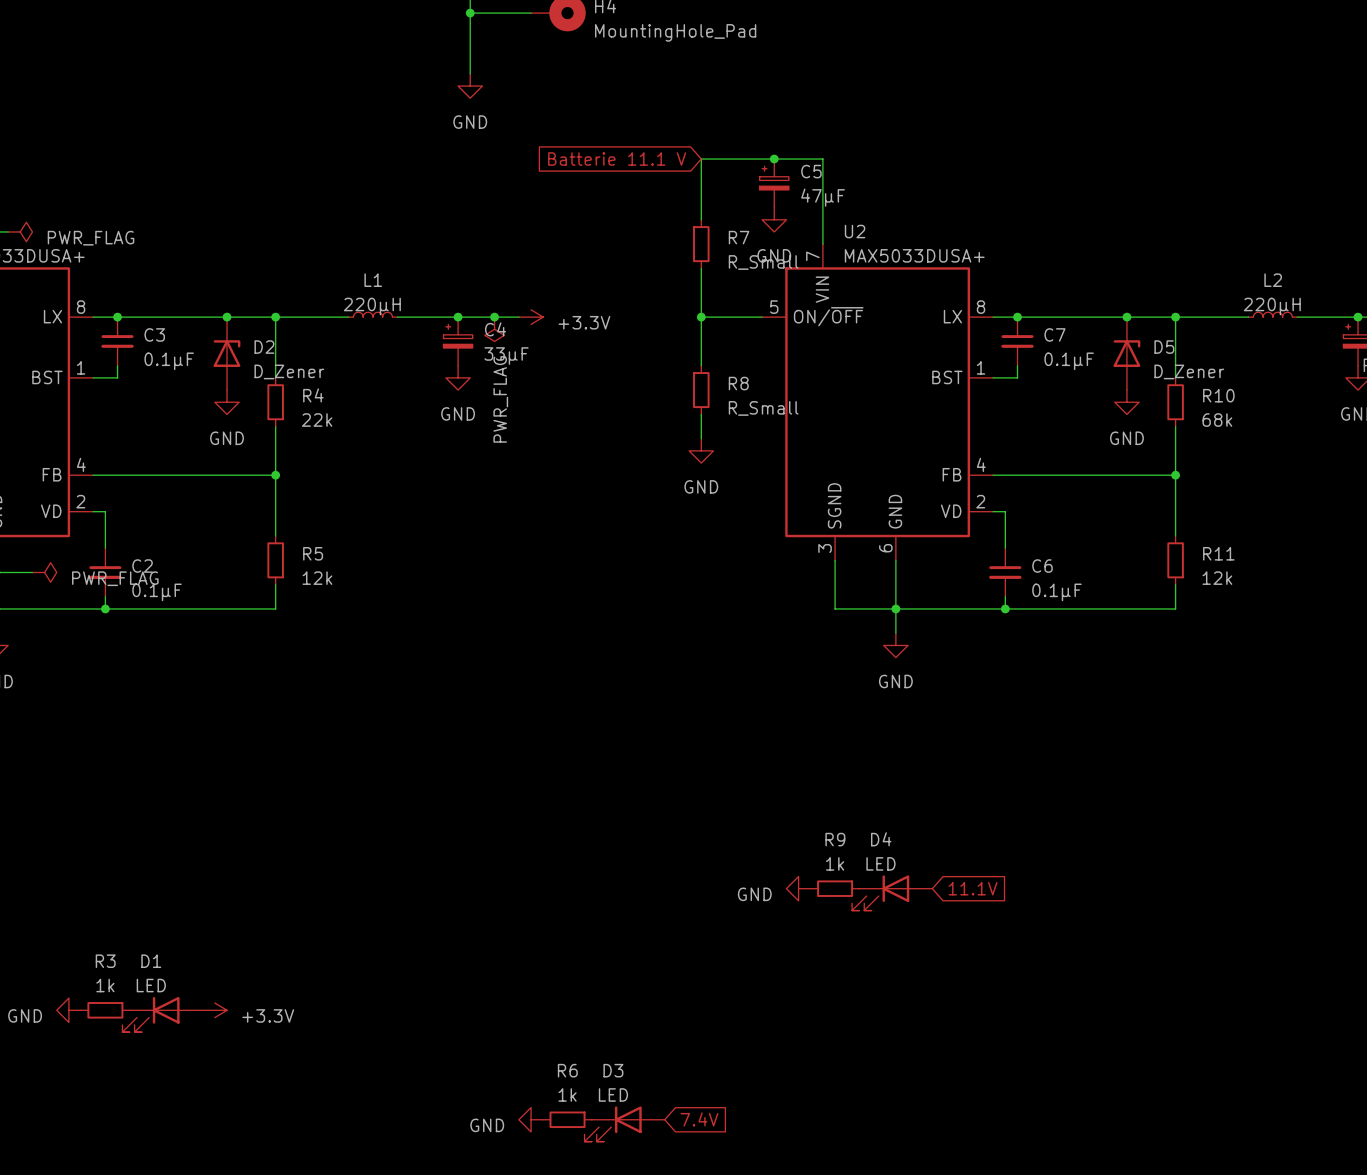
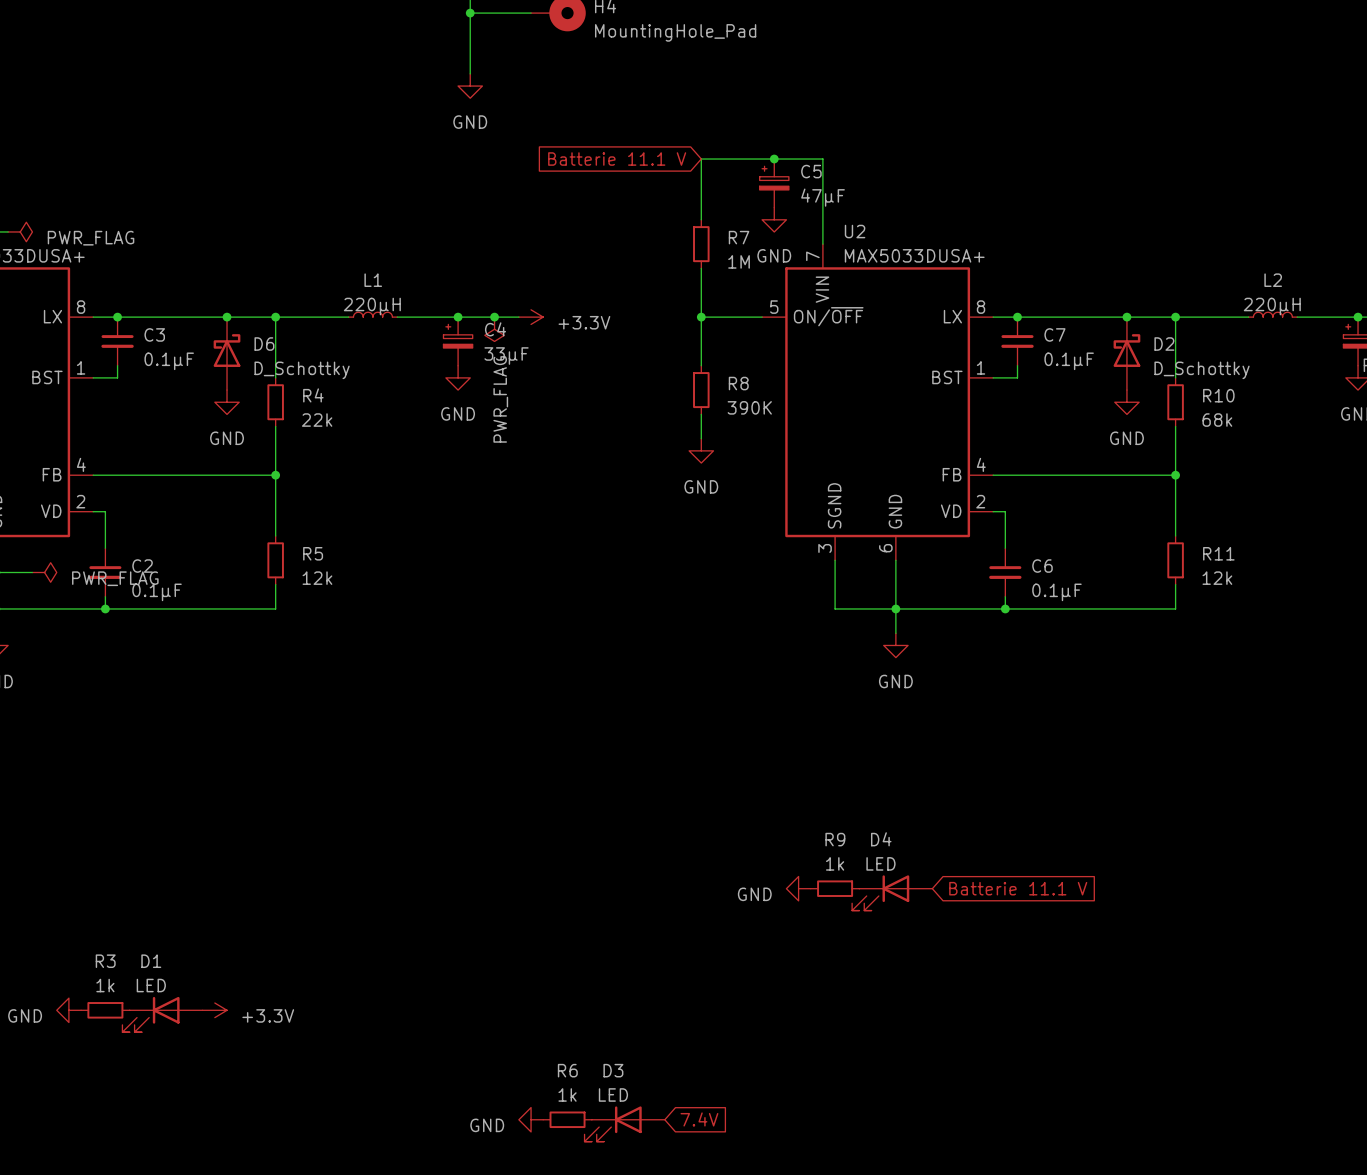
R7 value: R_Small (763, 262) -> 1M (739, 261)
D2 symbol: [213, 317, 241, 391] -> [1113, 317, 1141, 391]
D6: none -> D_Schottky (227, 353)
D5: D_Zener (1126, 353) -> none
D2 value: D_Zener (289, 371) -> D_Schottky (1202, 370)
R8 value: R_Small (763, 408) -> 390K (749, 407)
global label: 11.1V (973, 888) -> Batterie 11.1 V (1018, 888)

